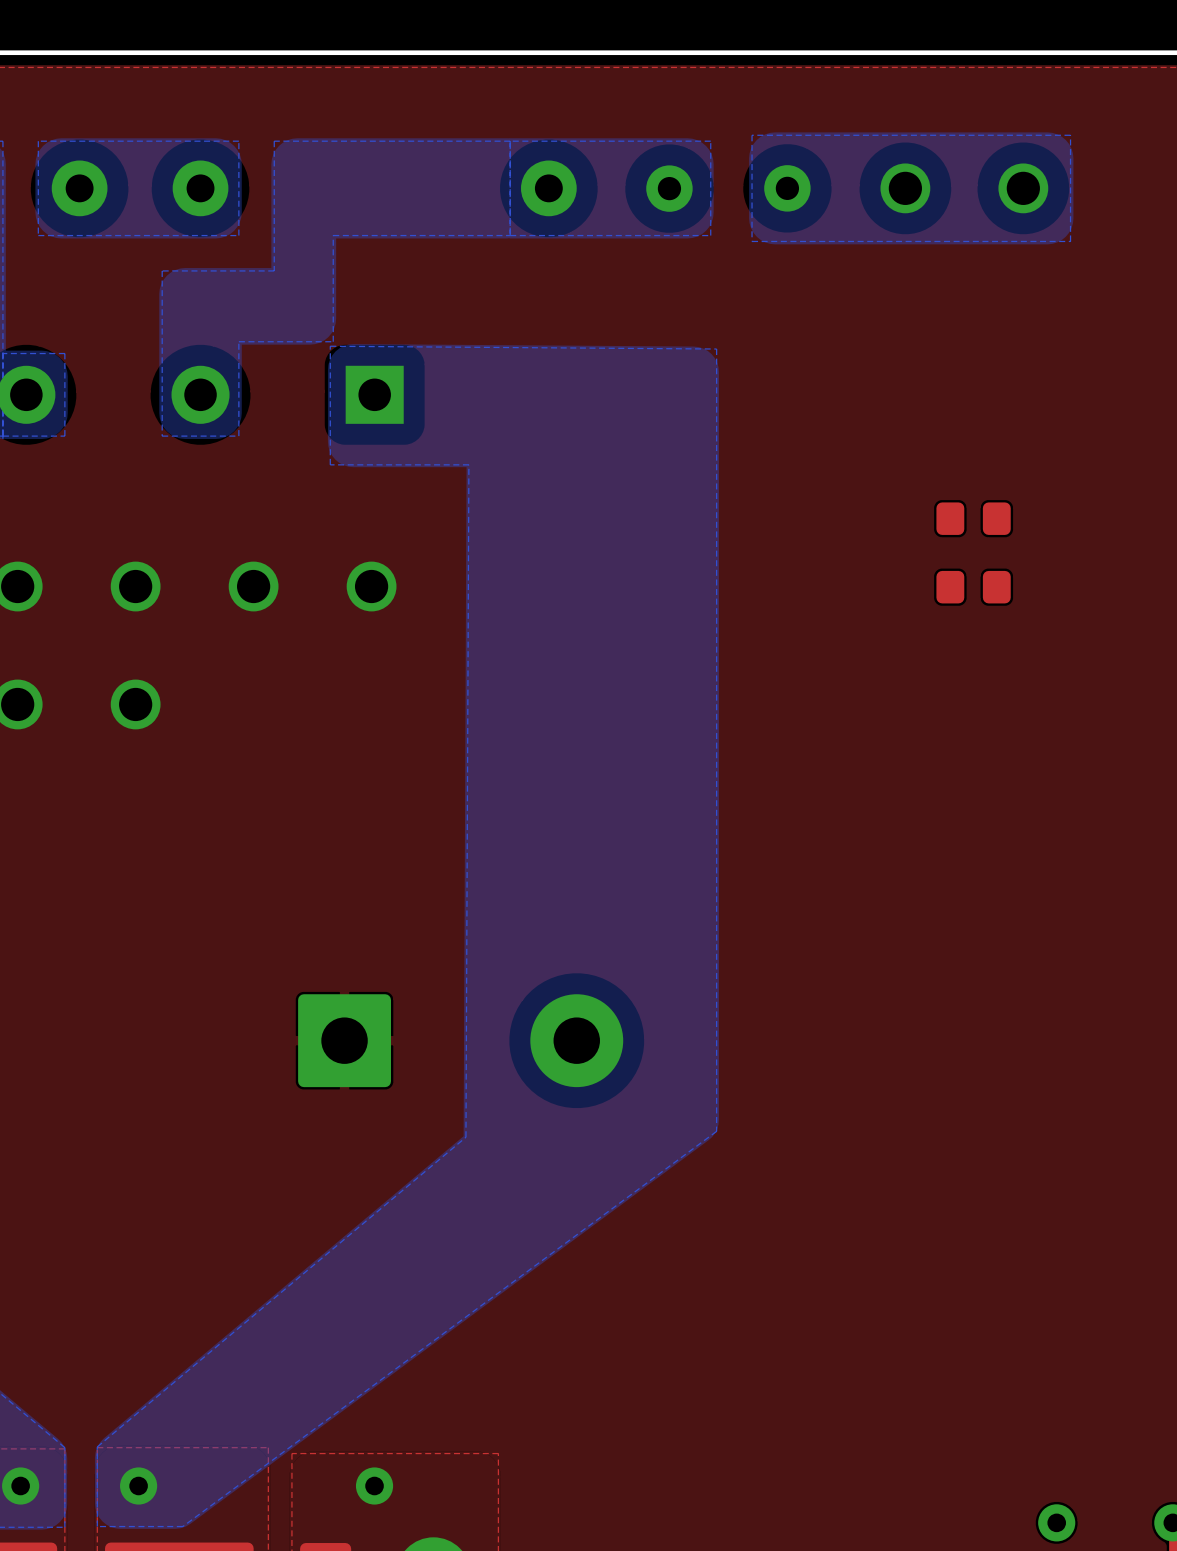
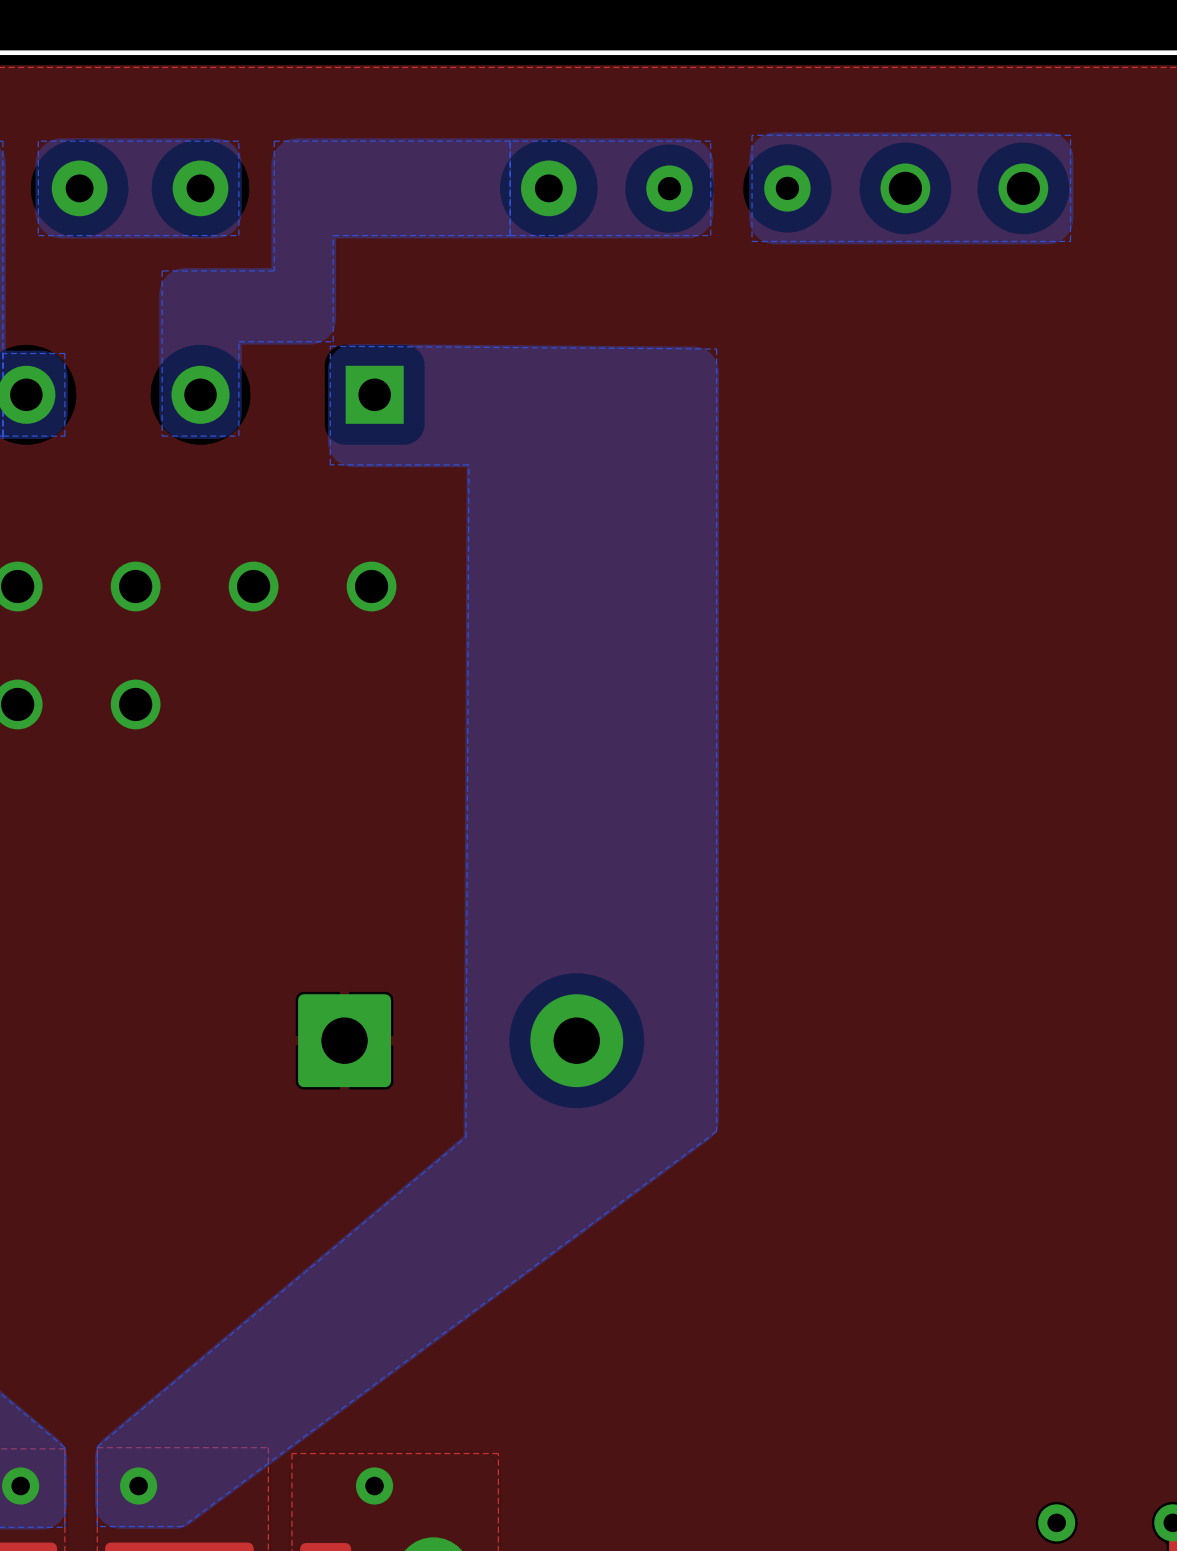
part: (973, 518) -> none
part: (973, 587) -> none

